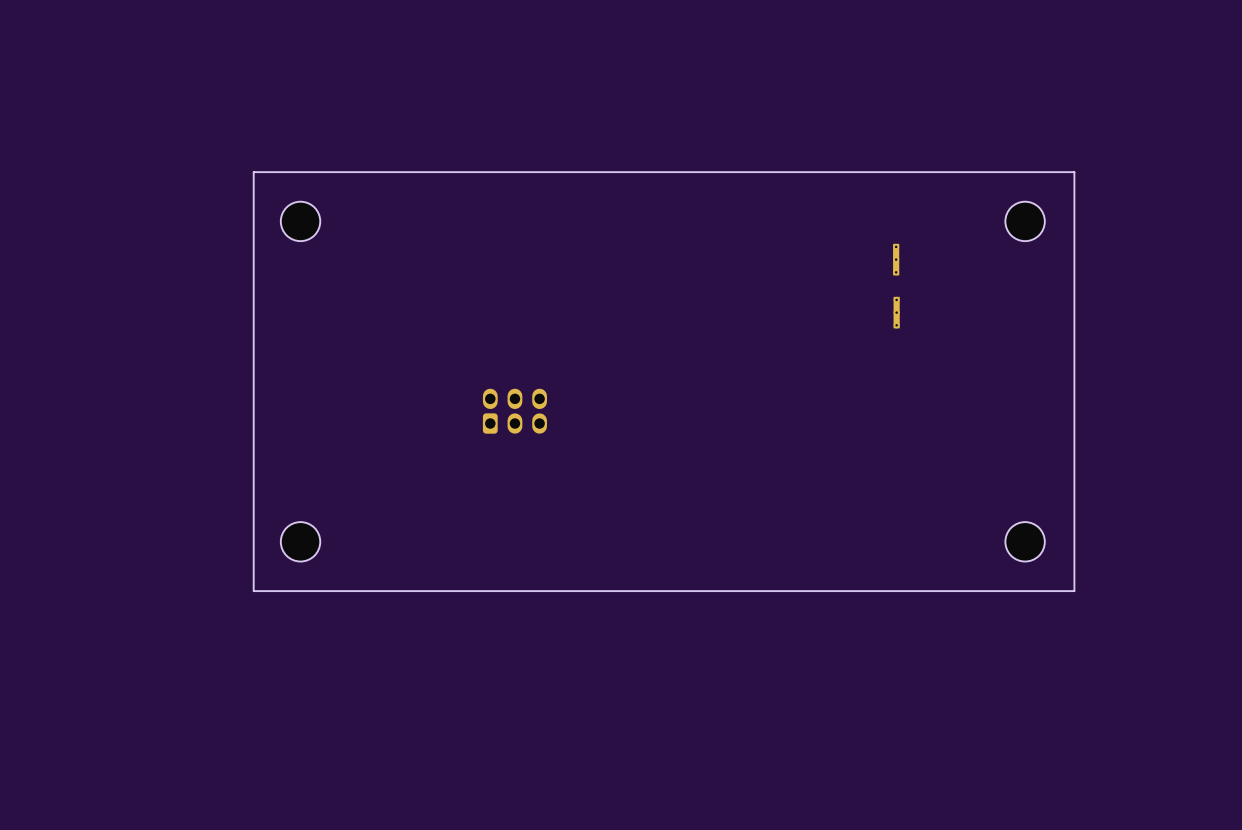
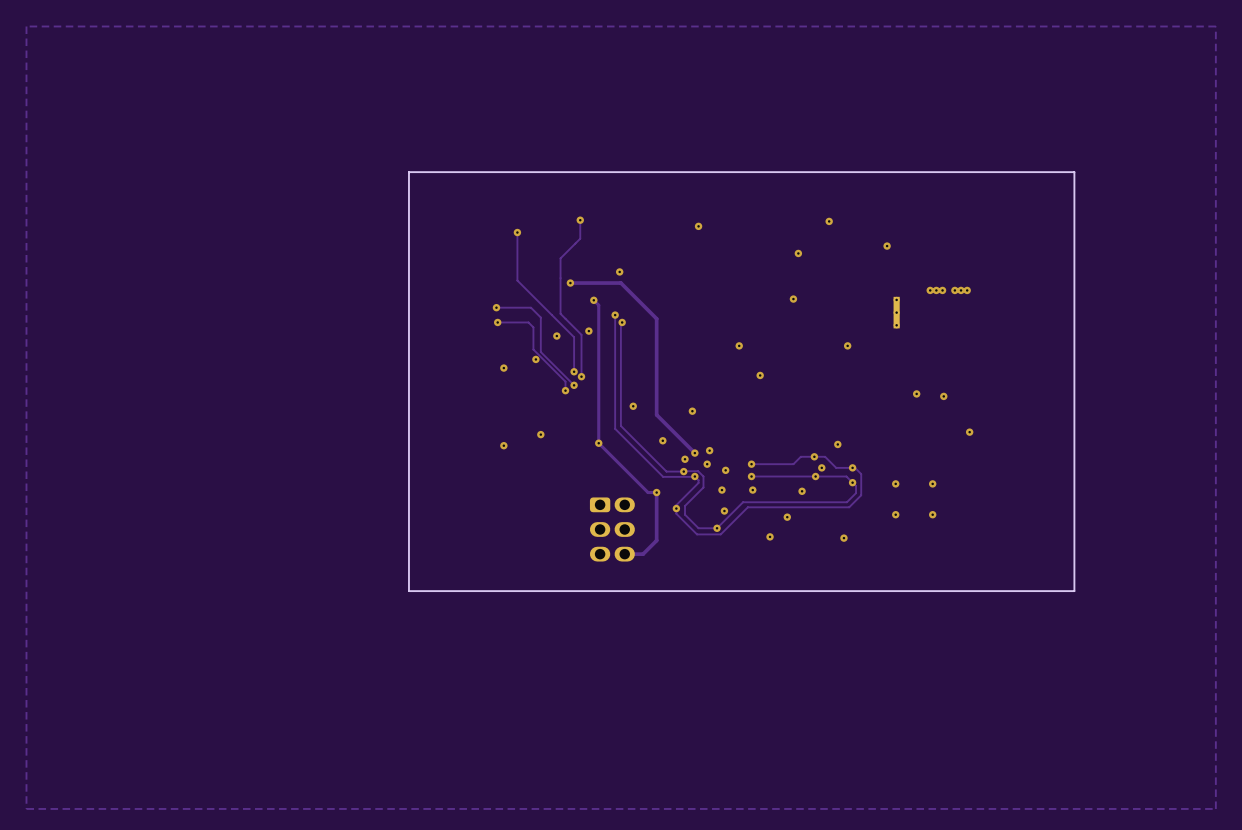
zone outline: none -> (1215, 26) (1215, 808) (26, 808) (26, 26) (1215, 26)
board edge: (408, 172) (253, 172) (253, 591) (408, 591) -> (408, 172) (408, 591)
track: none -> (580, 220) (580, 238) (560, 258) (560, 313) (581, 334) (581, 376)
via: none -> (580, 220)
part: (300, 221) -> none
via: none -> (829, 221)
part: (1025, 221) -> none
via: none -> (698, 226)
track: none -> (517, 232) (517, 280) (574, 337) (574, 371)
via: none -> (517, 232)
via: none -> (887, 246)
via: none -> (798, 253)
part: (896, 259) -> none
via: none -> (619, 271)
track: none -> (570, 283) (620, 283) (656, 318) (656, 414) (694, 453)
via: none -> (570, 283)
via: none -> (930, 290)
via: none -> (936, 290)
via: none -> (942, 290)
via: none -> (954, 290)
via: none -> (961, 290)
via: none -> (967, 290)
via: none -> (793, 299)
track: none -> (593, 300) (598, 305) (598, 443) (648, 492) (656, 492) (656, 540) (643, 554) (624, 554)
via: none -> (593, 300)
track: none -> (496, 307) (530, 307) (540, 317) (540, 352) (574, 385)
via: none -> (496, 307)
track: none -> (614, 315) (615, 428) (663, 476) (694, 476) (698, 480) (698, 482) (676, 505) (676, 513) (697, 534) (720, 534) (747, 507) (849, 507) (861, 495) (861, 474) (855, 467) (836, 467) (825, 456) (800, 456) (793, 464) (751, 464)
via: none -> (615, 315)
track: none -> (497, 322) (528, 322) (533, 327) (533, 349) (565, 381) (565, 390)
via: none -> (497, 322)
track: none -> (622, 322) (620, 425) (666, 471) (685, 470)
via: none -> (622, 322)
via: none -> (588, 331)
via: none -> (556, 336)
via: none -> (739, 345)
via: none -> (847, 345)
via: none -> (535, 359)
via: none -> (503, 368)
via: none -> (574, 371)
via: none -> (760, 375)
via: none -> (581, 376)
via: none -> (574, 385)
via: none -> (565, 390)
via: none -> (916, 393)
via: none -> (943, 396)
via: none -> (633, 406)
part rotation: 0° (514, 411) -> 90° clockwise (612, 529)
part position: (514, 411) -> (612, 529)
via: none -> (692, 411)
via: none -> (969, 432)
via: none -> (540, 434)
via: none -> (662, 440)
via: none -> (598, 443)
via: none -> (837, 444)
via: none -> (503, 445)
via: none -> (709, 450)
via: none -> (694, 453)
via: none -> (814, 456)
via: none -> (685, 459)
via: none -> (707, 464)
via: none -> (751, 464)
via: none -> (821, 467)
via: none -> (852, 467)
via: none -> (725, 470)
via: none -> (683, 471)
track: none -> (684, 471) (698, 471) (703, 476) (703, 487) (685, 505) (685, 514) (698, 528) (717, 528) (743, 502) (846, 502) (856, 493) (856, 486) (846, 476) (751, 476)
via: none -> (694, 476)
via: none -> (751, 476)
via: none -> (815, 476)
via: none -> (852, 482)
via: none -> (895, 483)
via: none -> (932, 483)
via: none -> (721, 490)
via: none -> (752, 490)
via: none -> (802, 491)
via: none -> (656, 492)
via: none -> (676, 508)
via: none -> (724, 511)
via: none -> (895, 514)
via: none -> (932, 514)
via: none -> (787, 517)
via: none -> (717, 528)
via: none -> (770, 536)
via: none -> (843, 538)
part: (300, 541) -> none
part: (1025, 541) -> none

